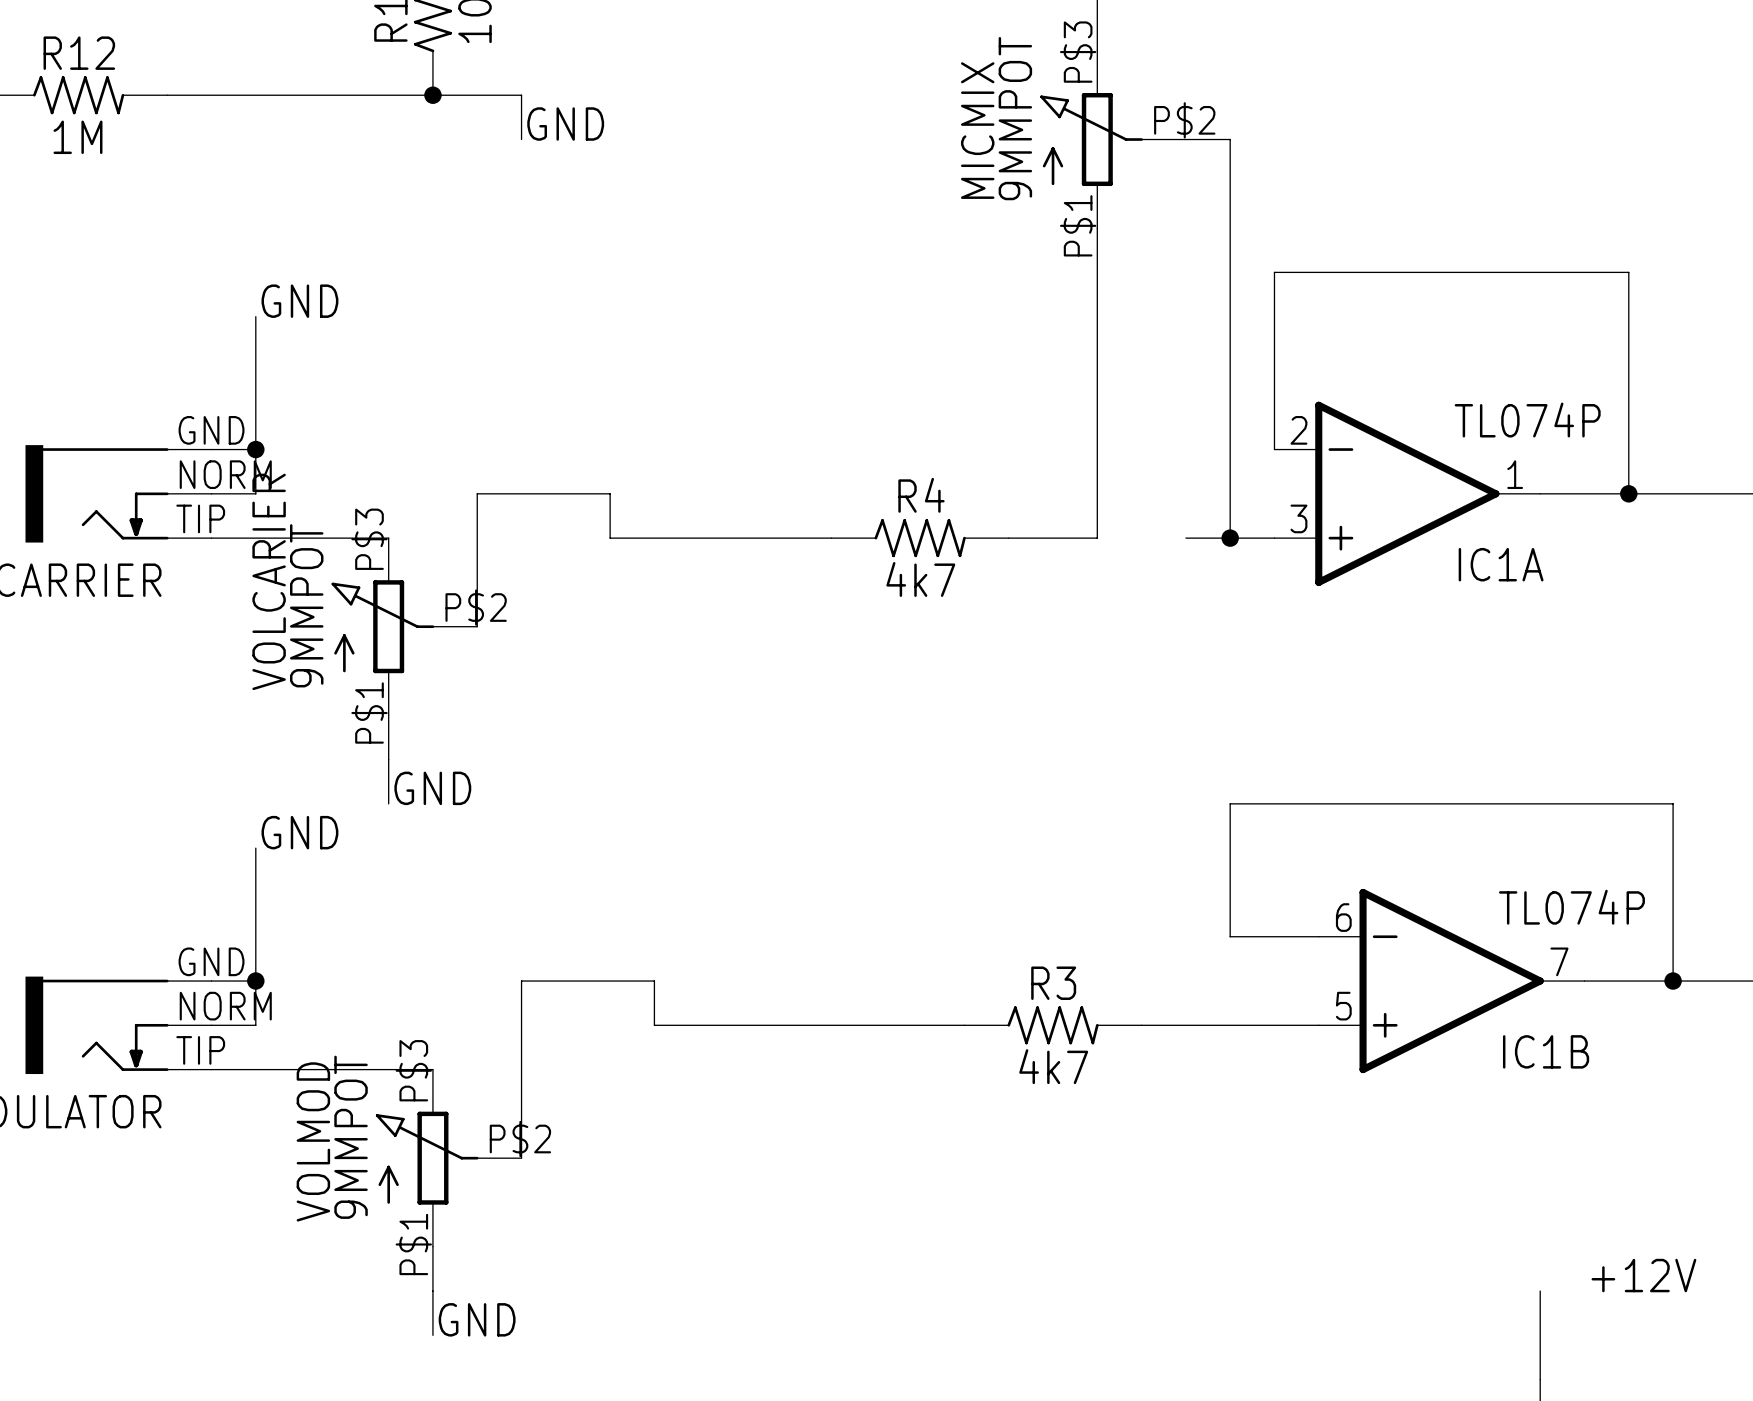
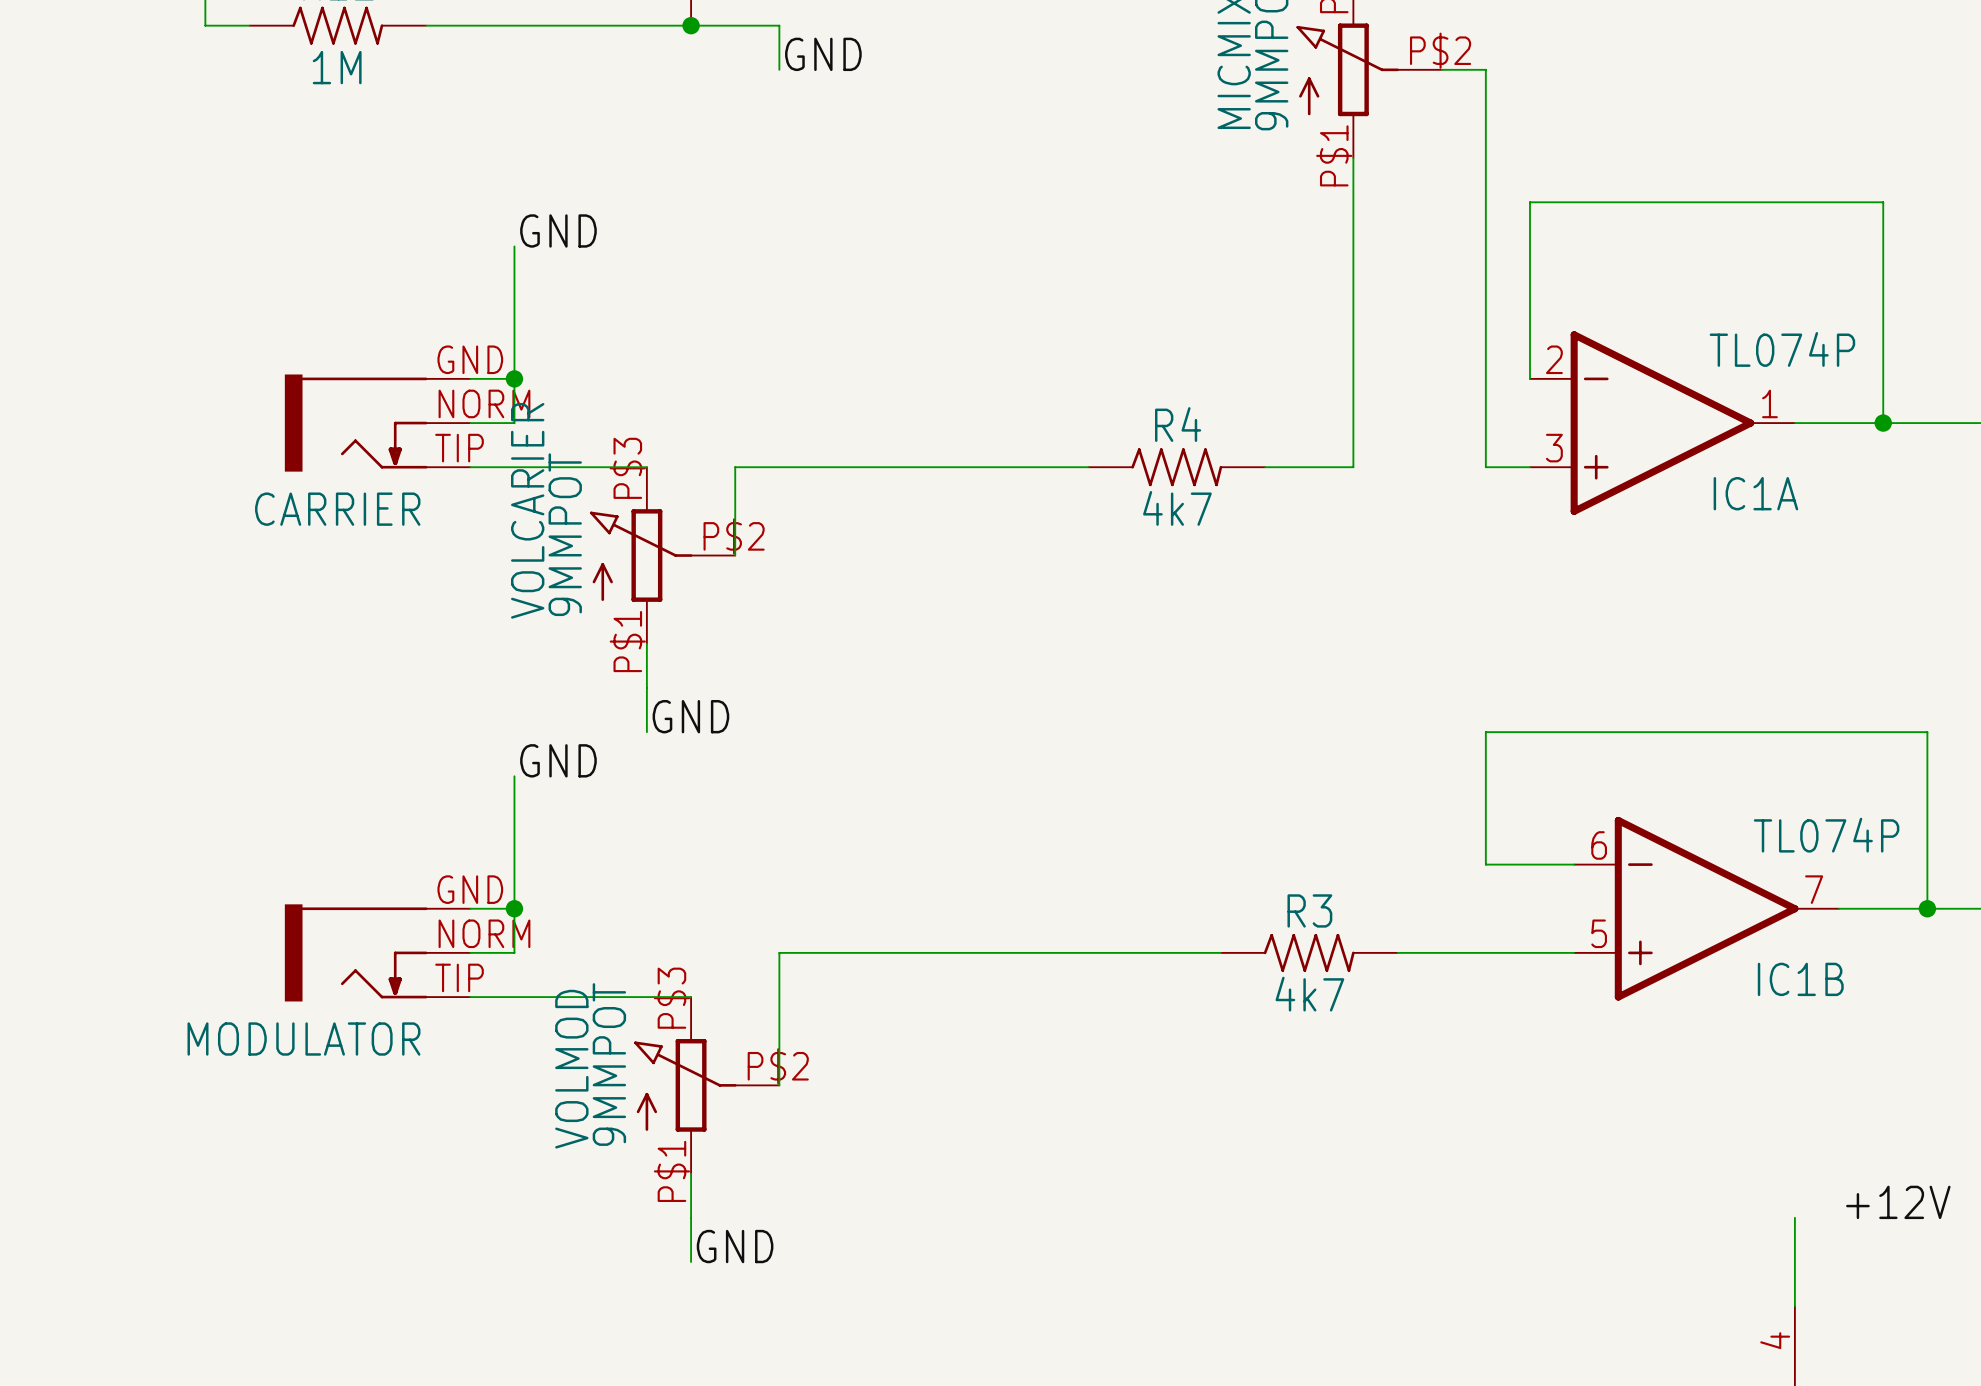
wire: (477, 538) (477, 493) (610, 493) (610, 538) -> (735, 467) (867, 467)
wire: (1185, 538) (1230, 538) -> none
junction: (1230, 538) -> none
wire: (521, 1025) (521, 981) (654, 981) (654, 1025) -> (779, 952) (911, 952)

